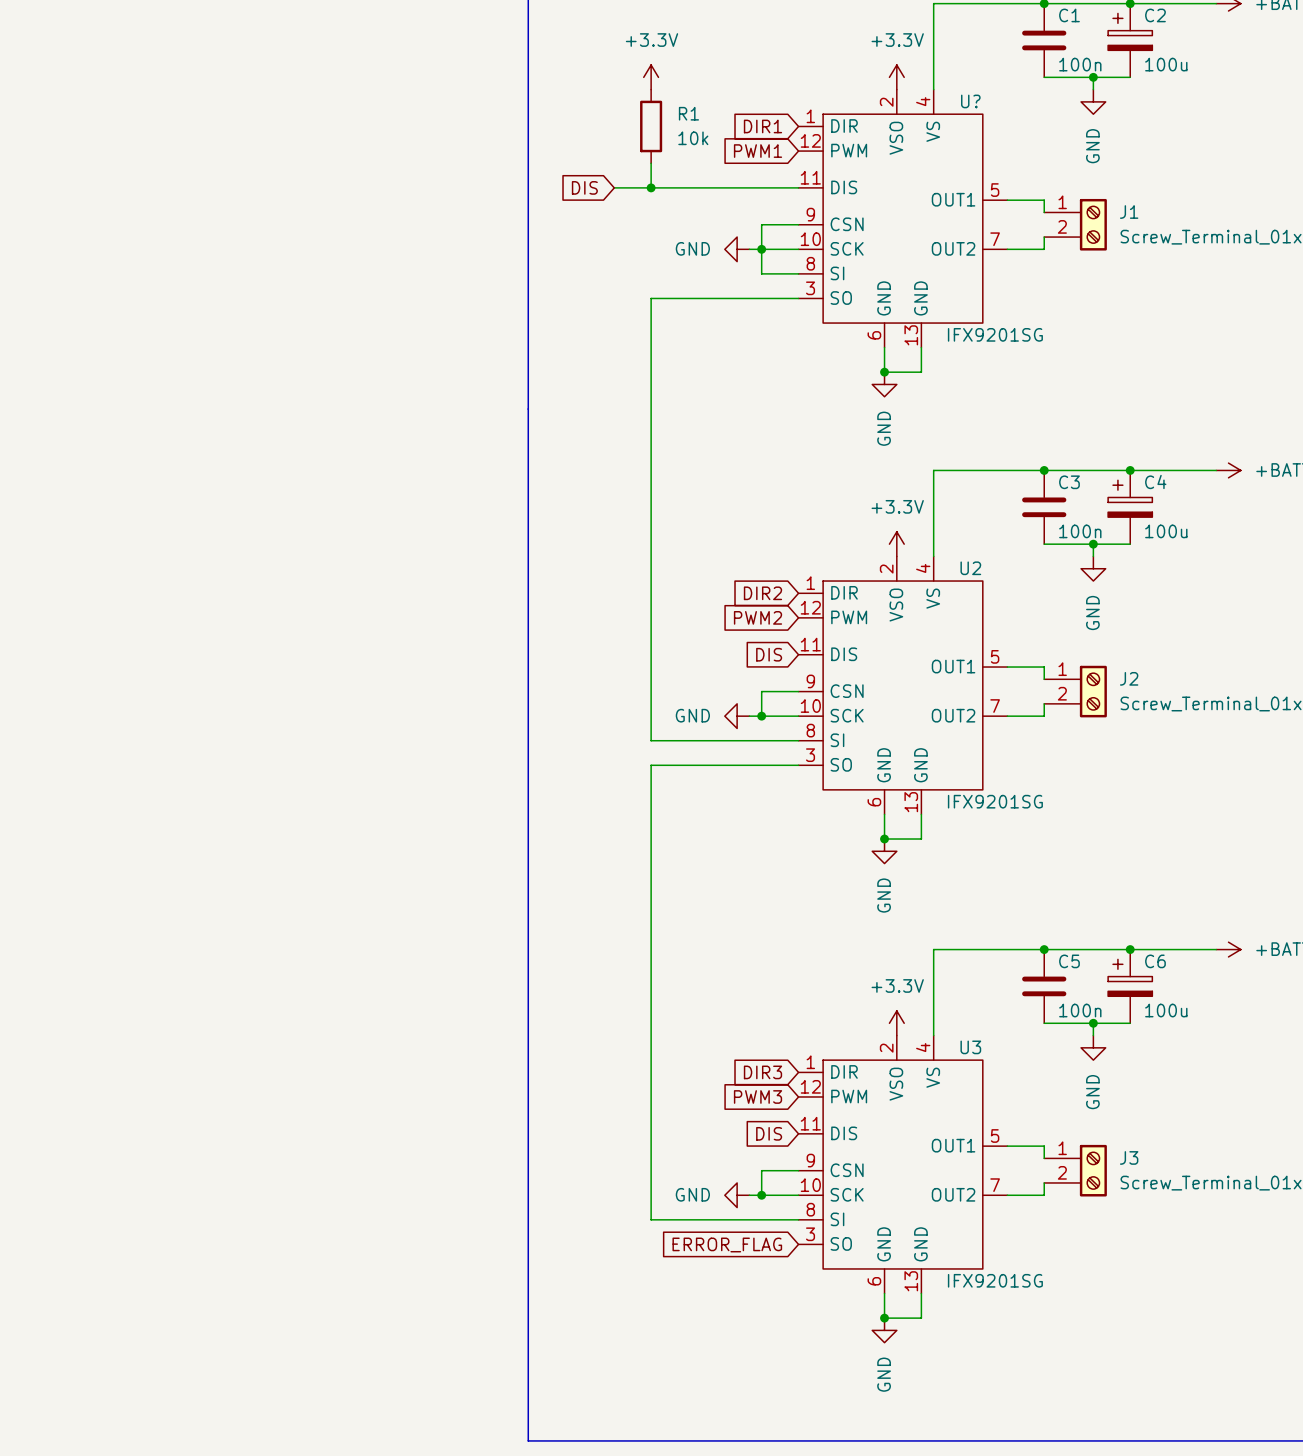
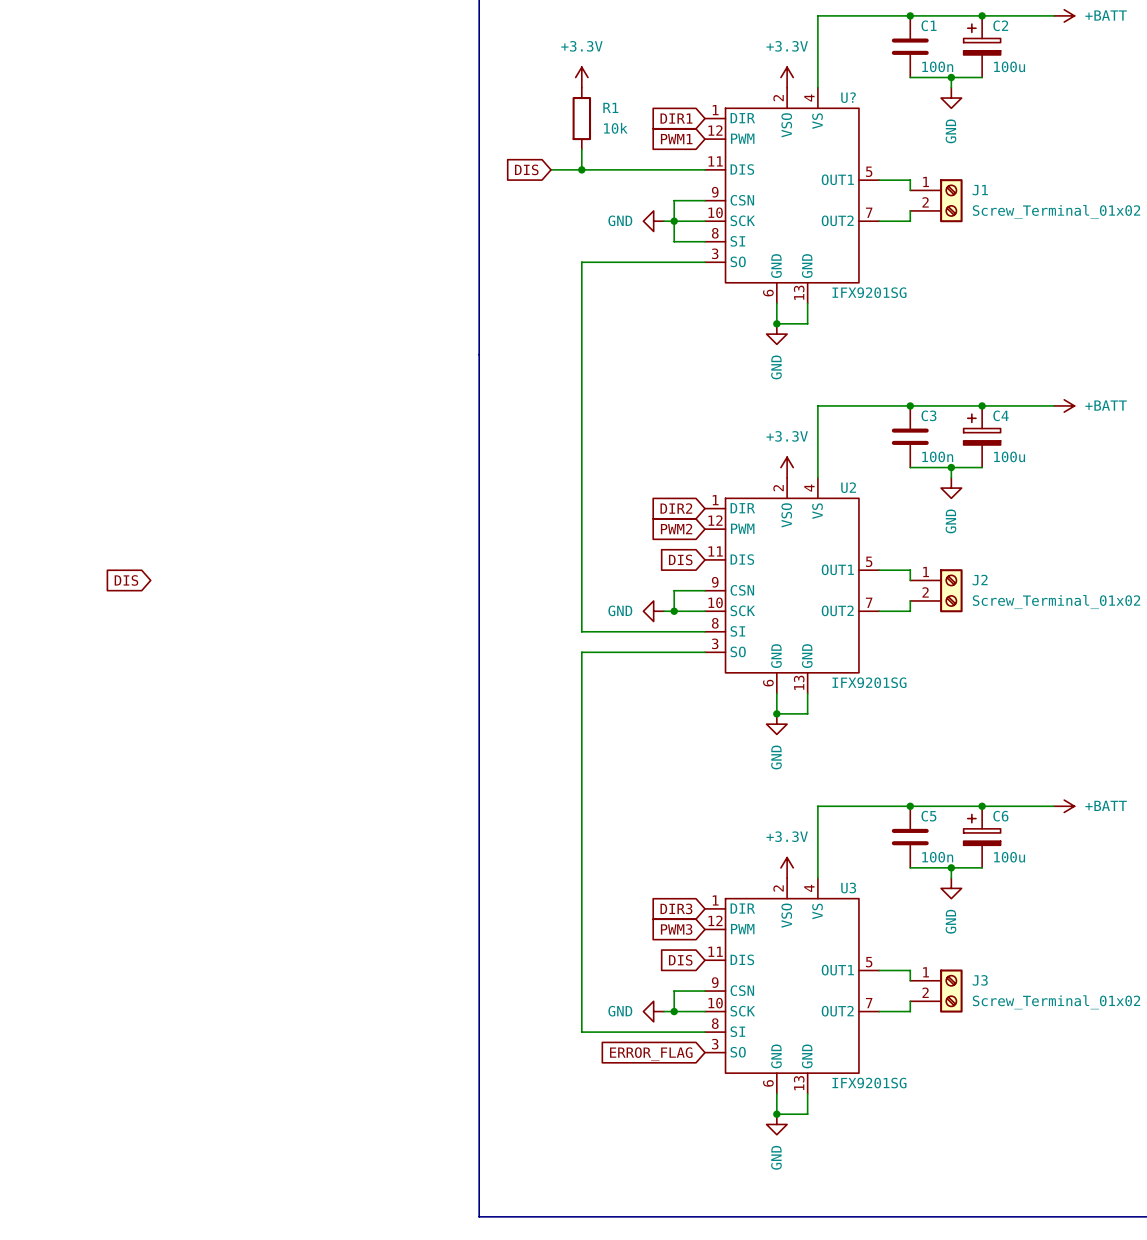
global label: none -> DIS (126, 580)

